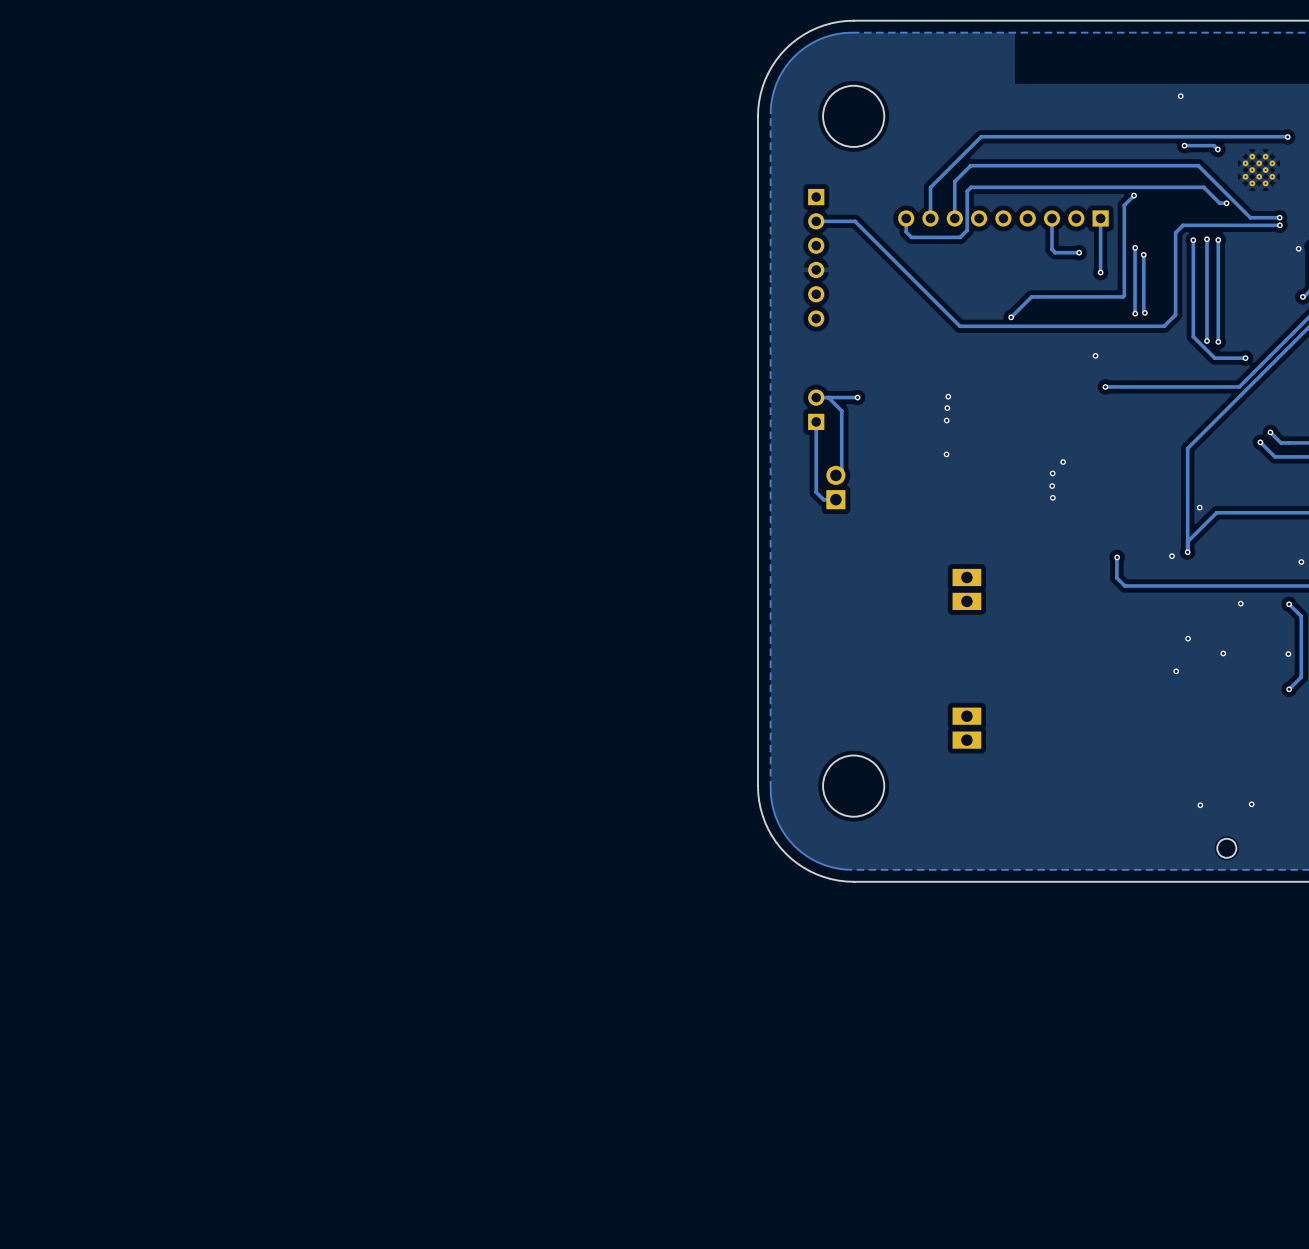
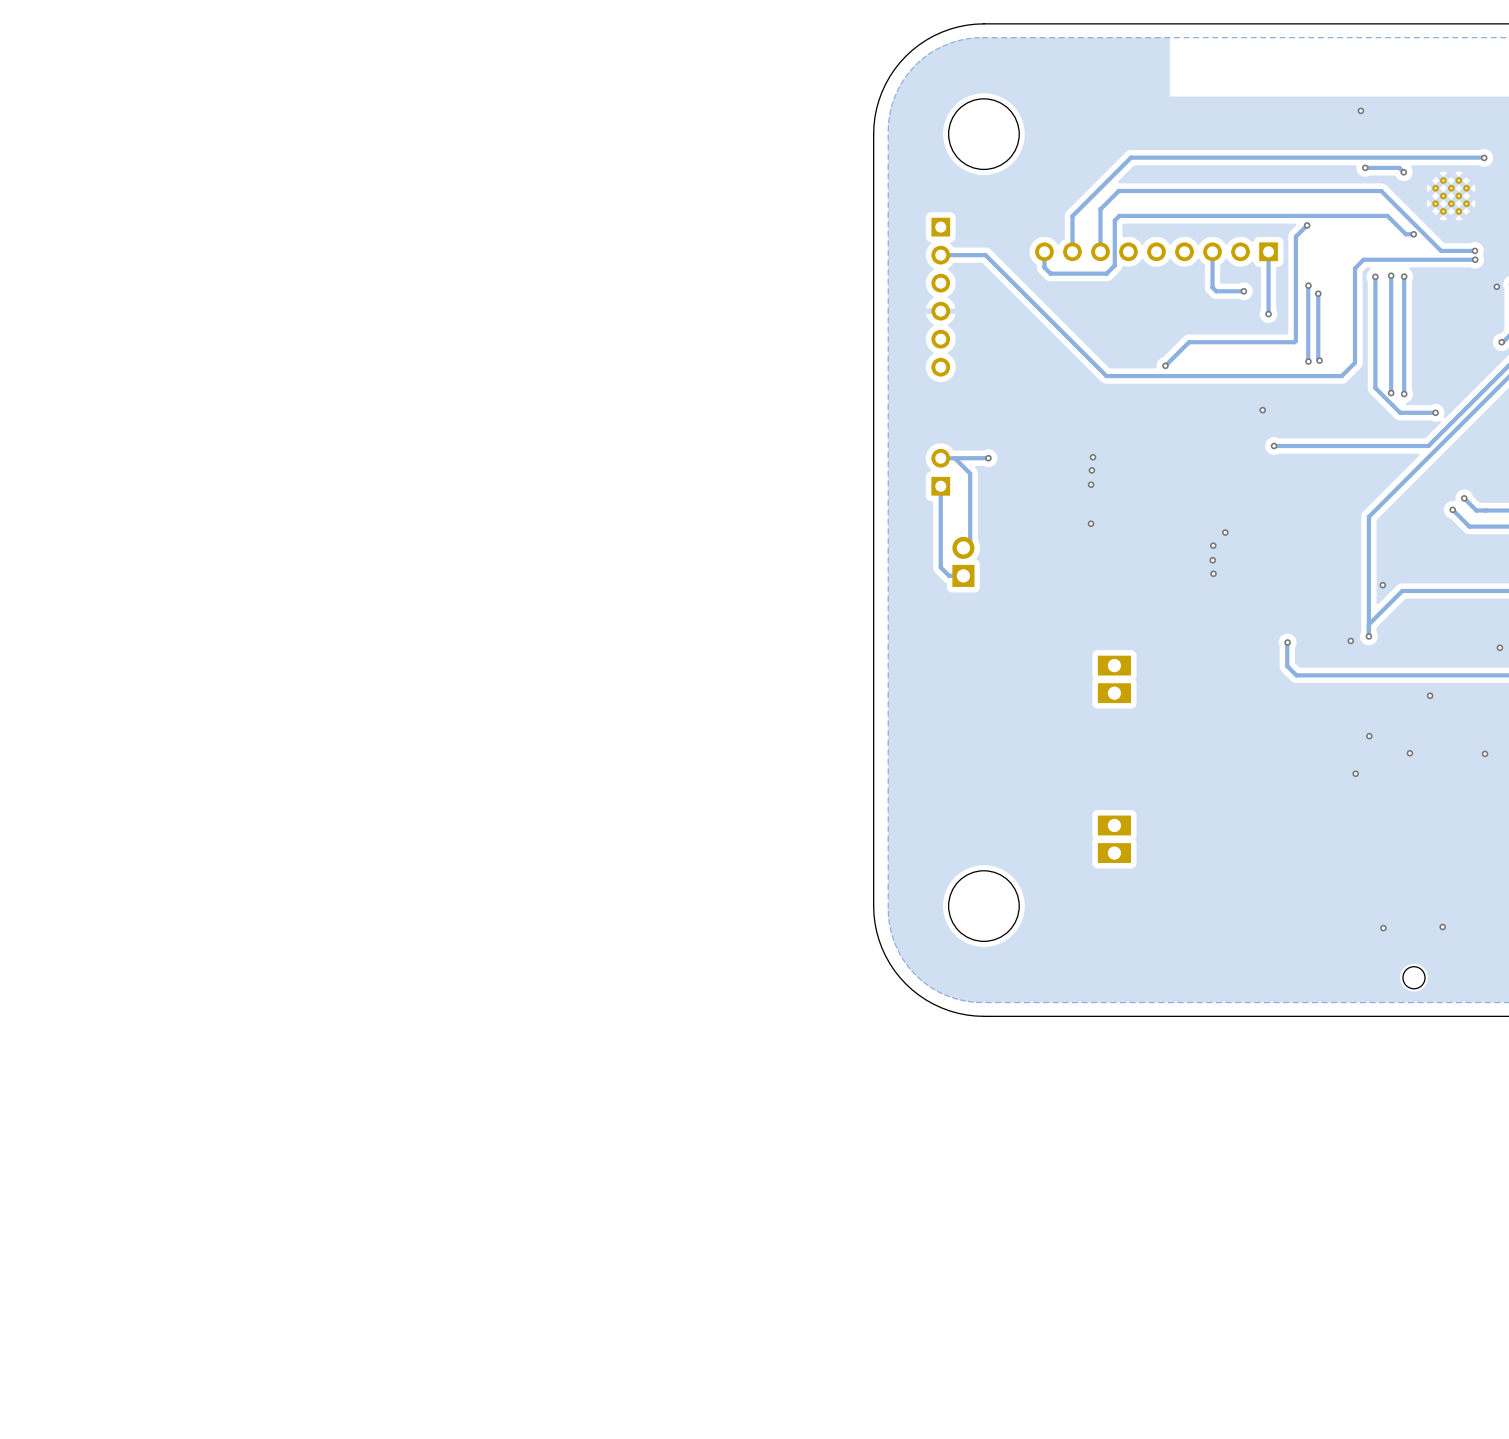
track: (1289, 604) (1301, 616) (1301, 677) (1289, 689) -> none
via: (1289, 604) -> none
via: (1289, 689) -> none

